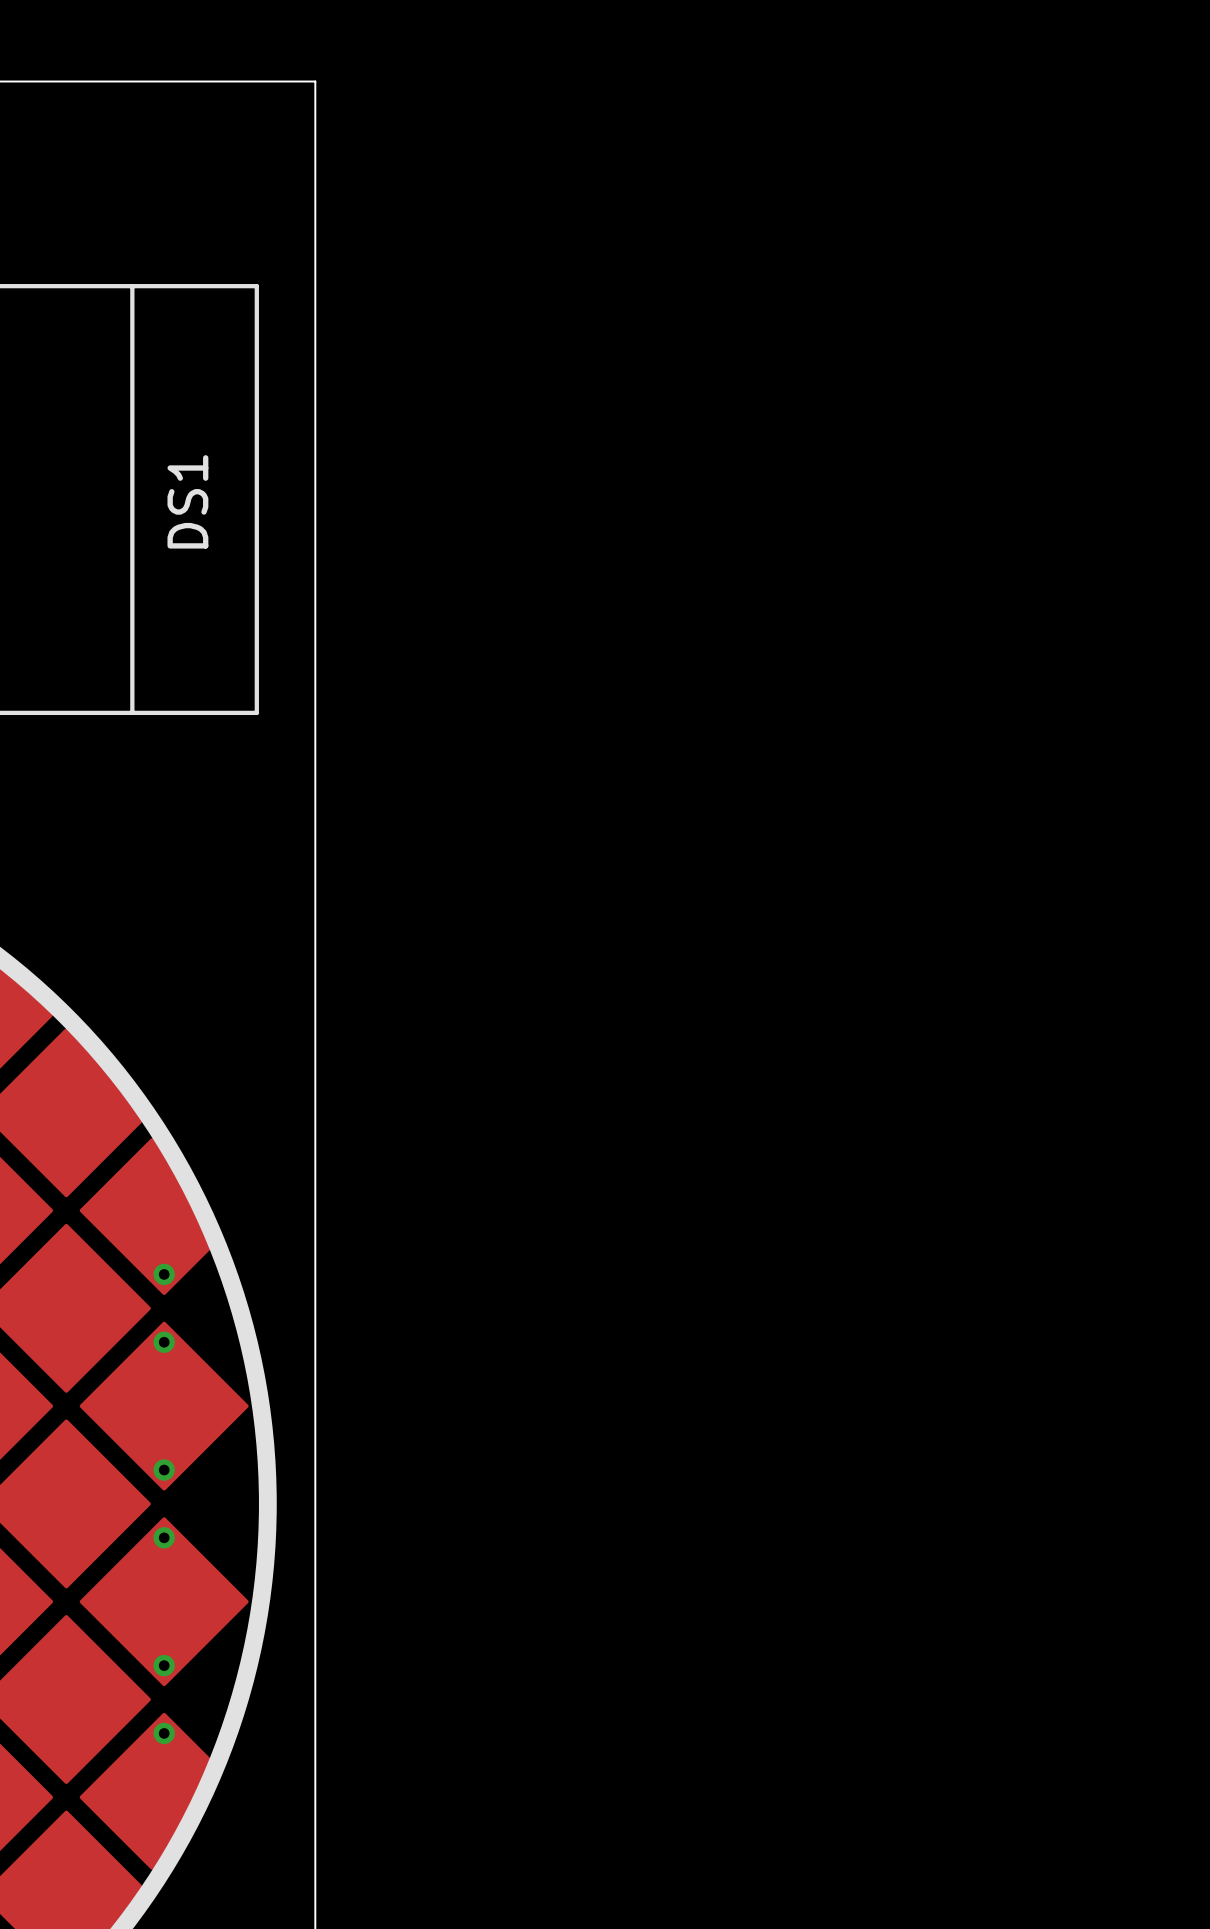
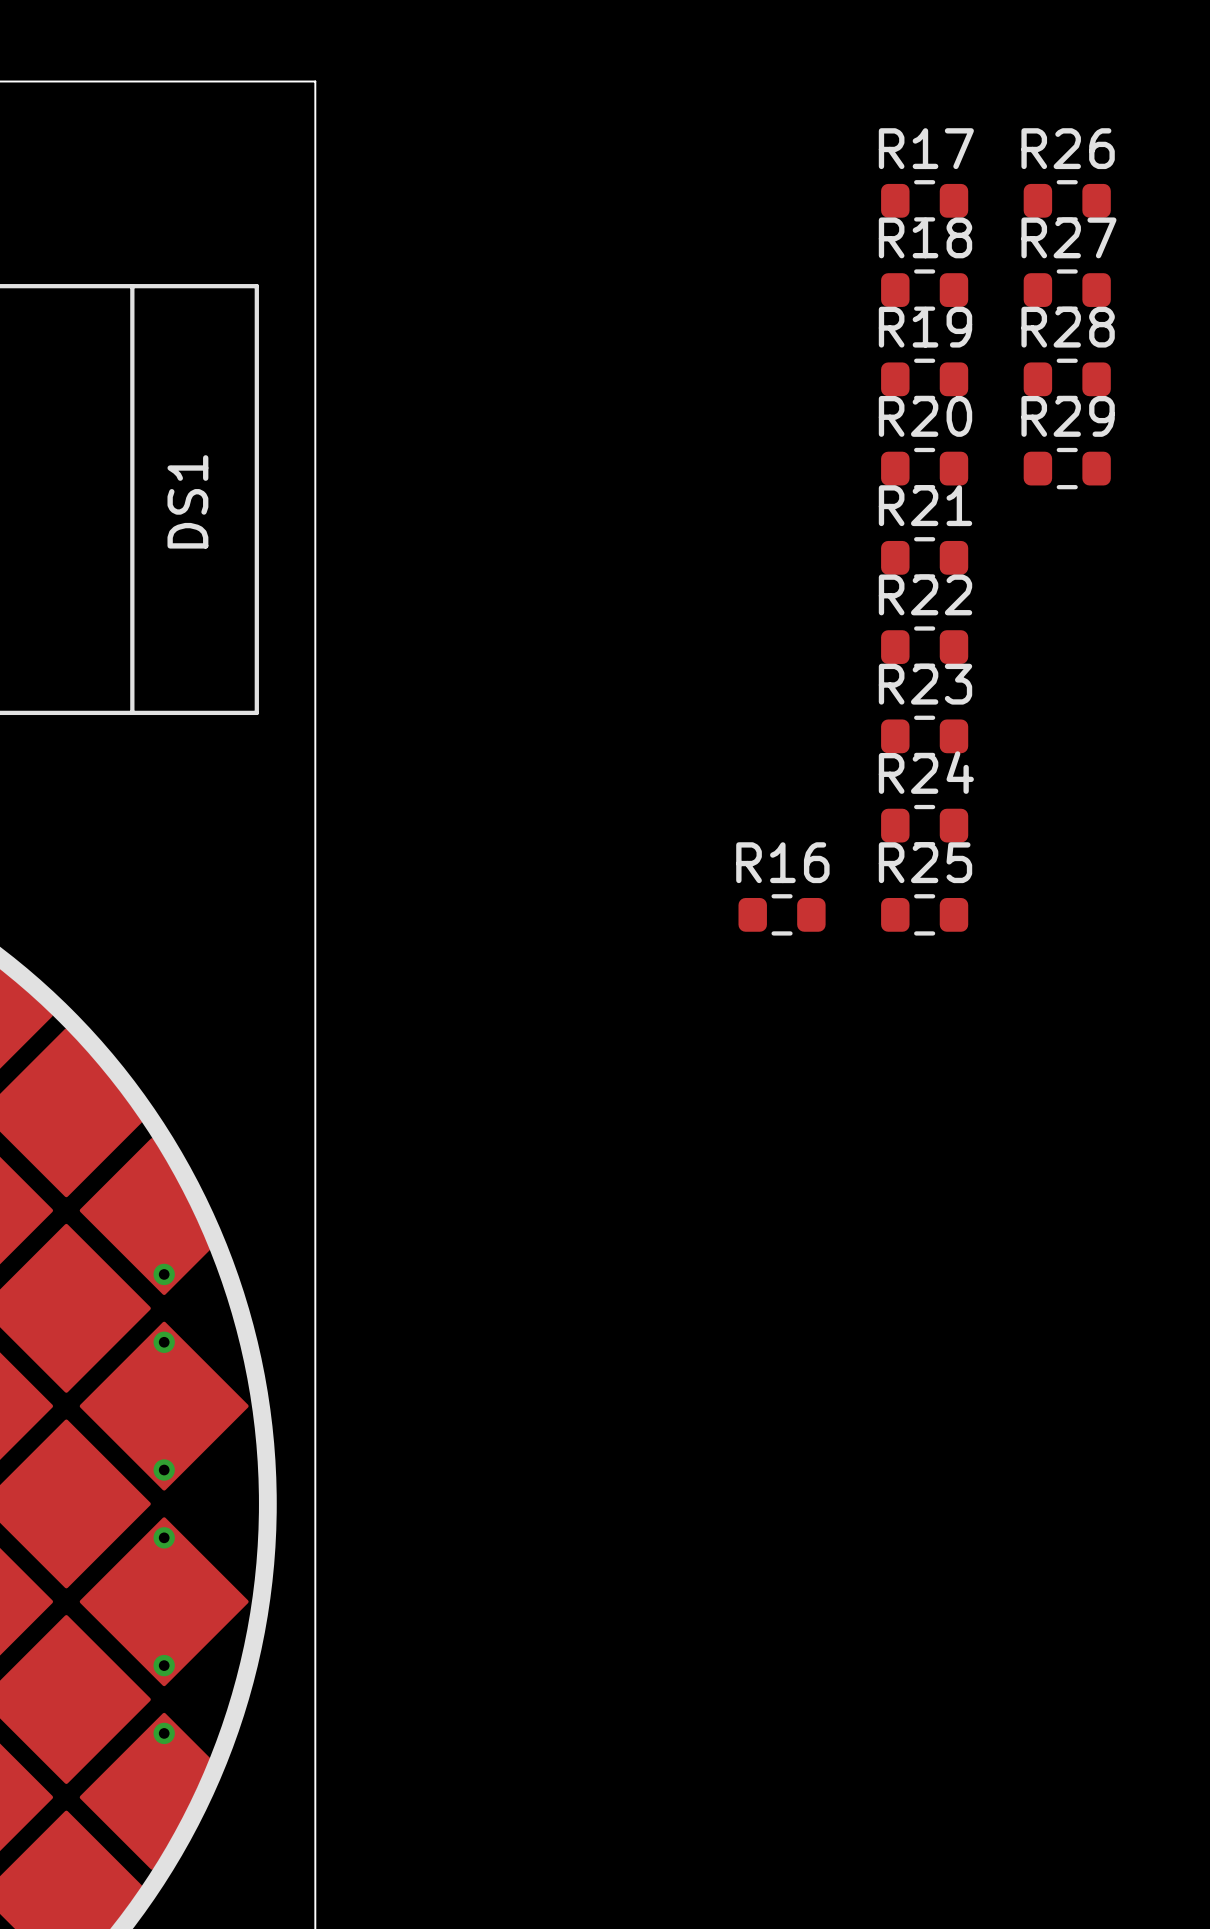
R17: none -> (924, 200)
R26: none -> (1067, 200)
R18: none -> (924, 290)
R27: none -> (1067, 290)
R19: none -> (924, 379)
R28: none -> (1067, 379)
R20: none -> (924, 468)
R29: none -> (1067, 468)
R21: none -> (924, 557)
R22: none -> (924, 647)
R23: none -> (924, 736)
R24: none -> (924, 825)
R16: none -> (782, 914)
R25: none -> (924, 914)

